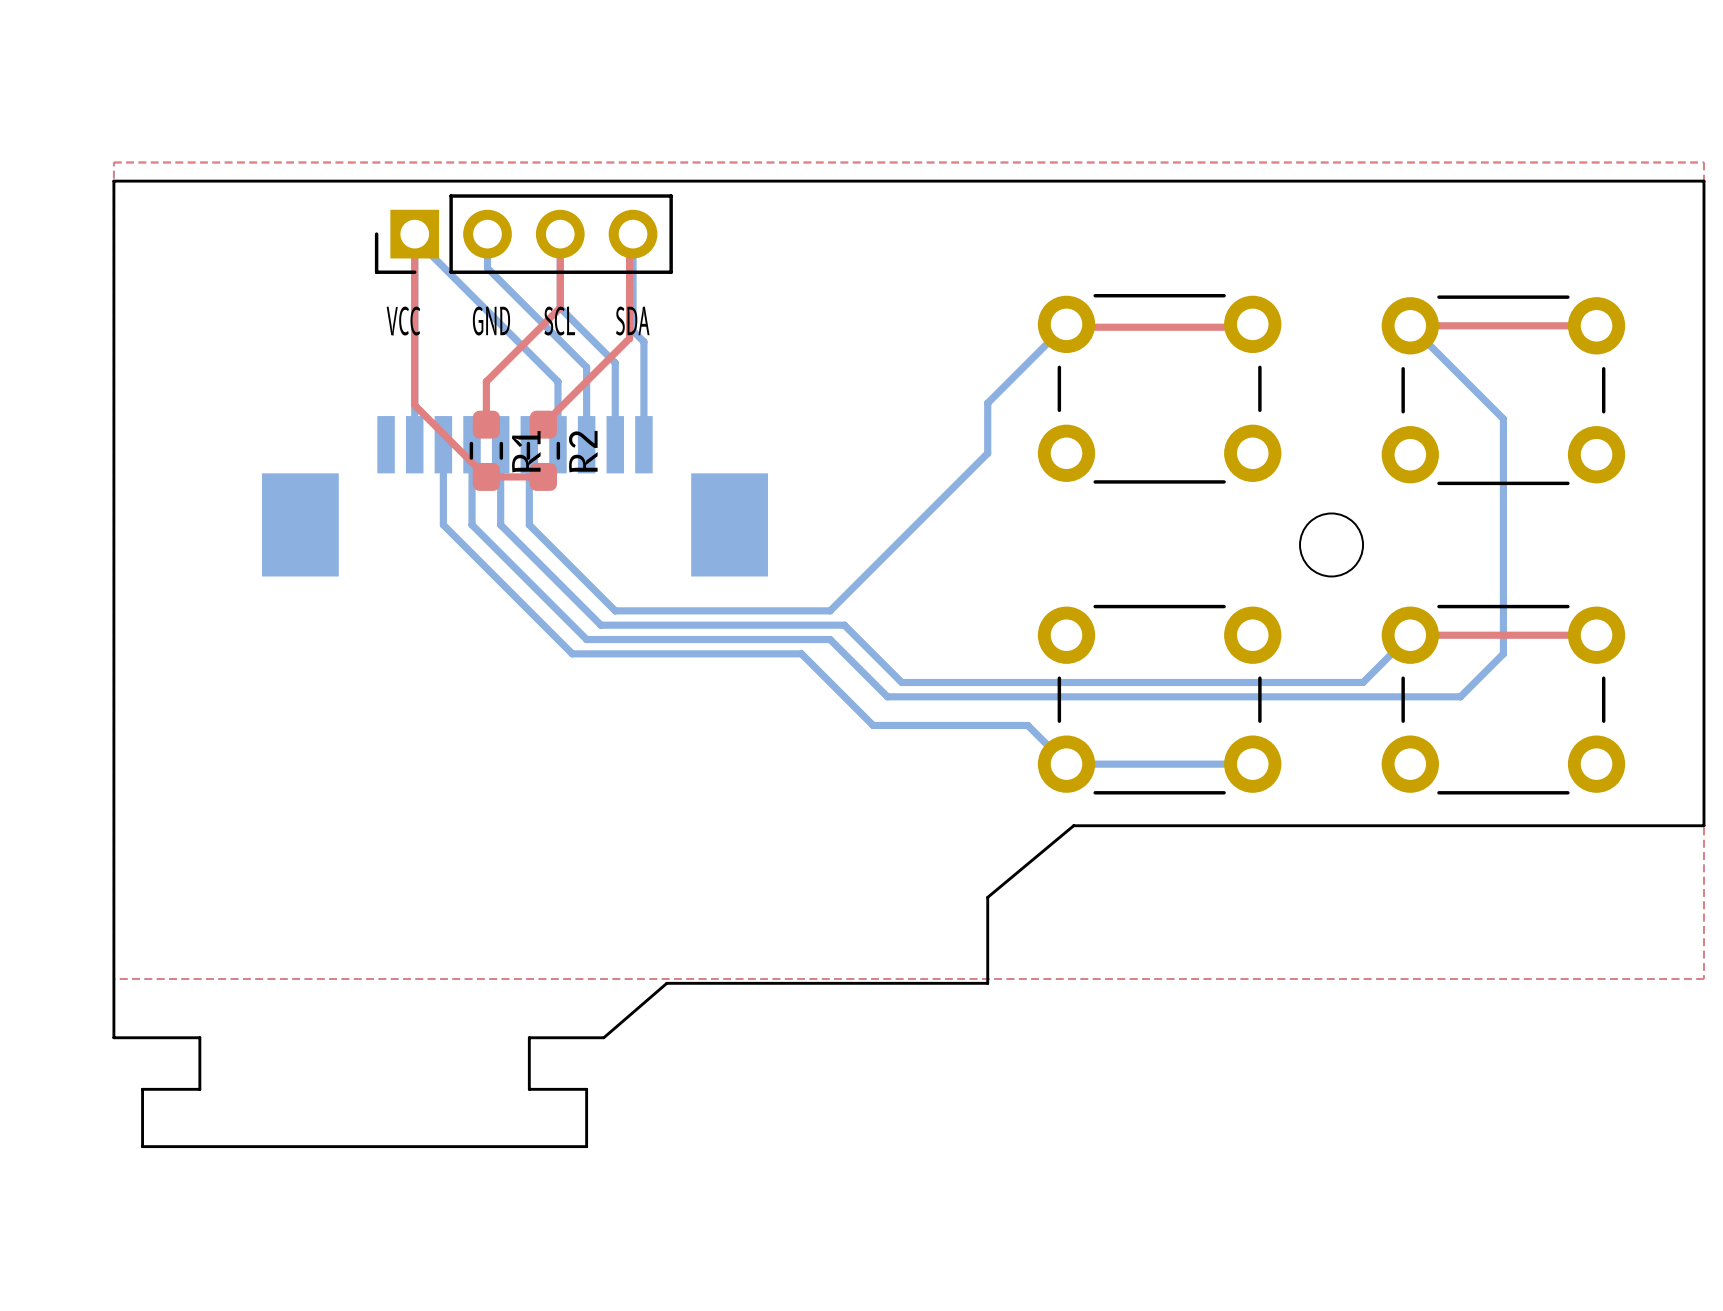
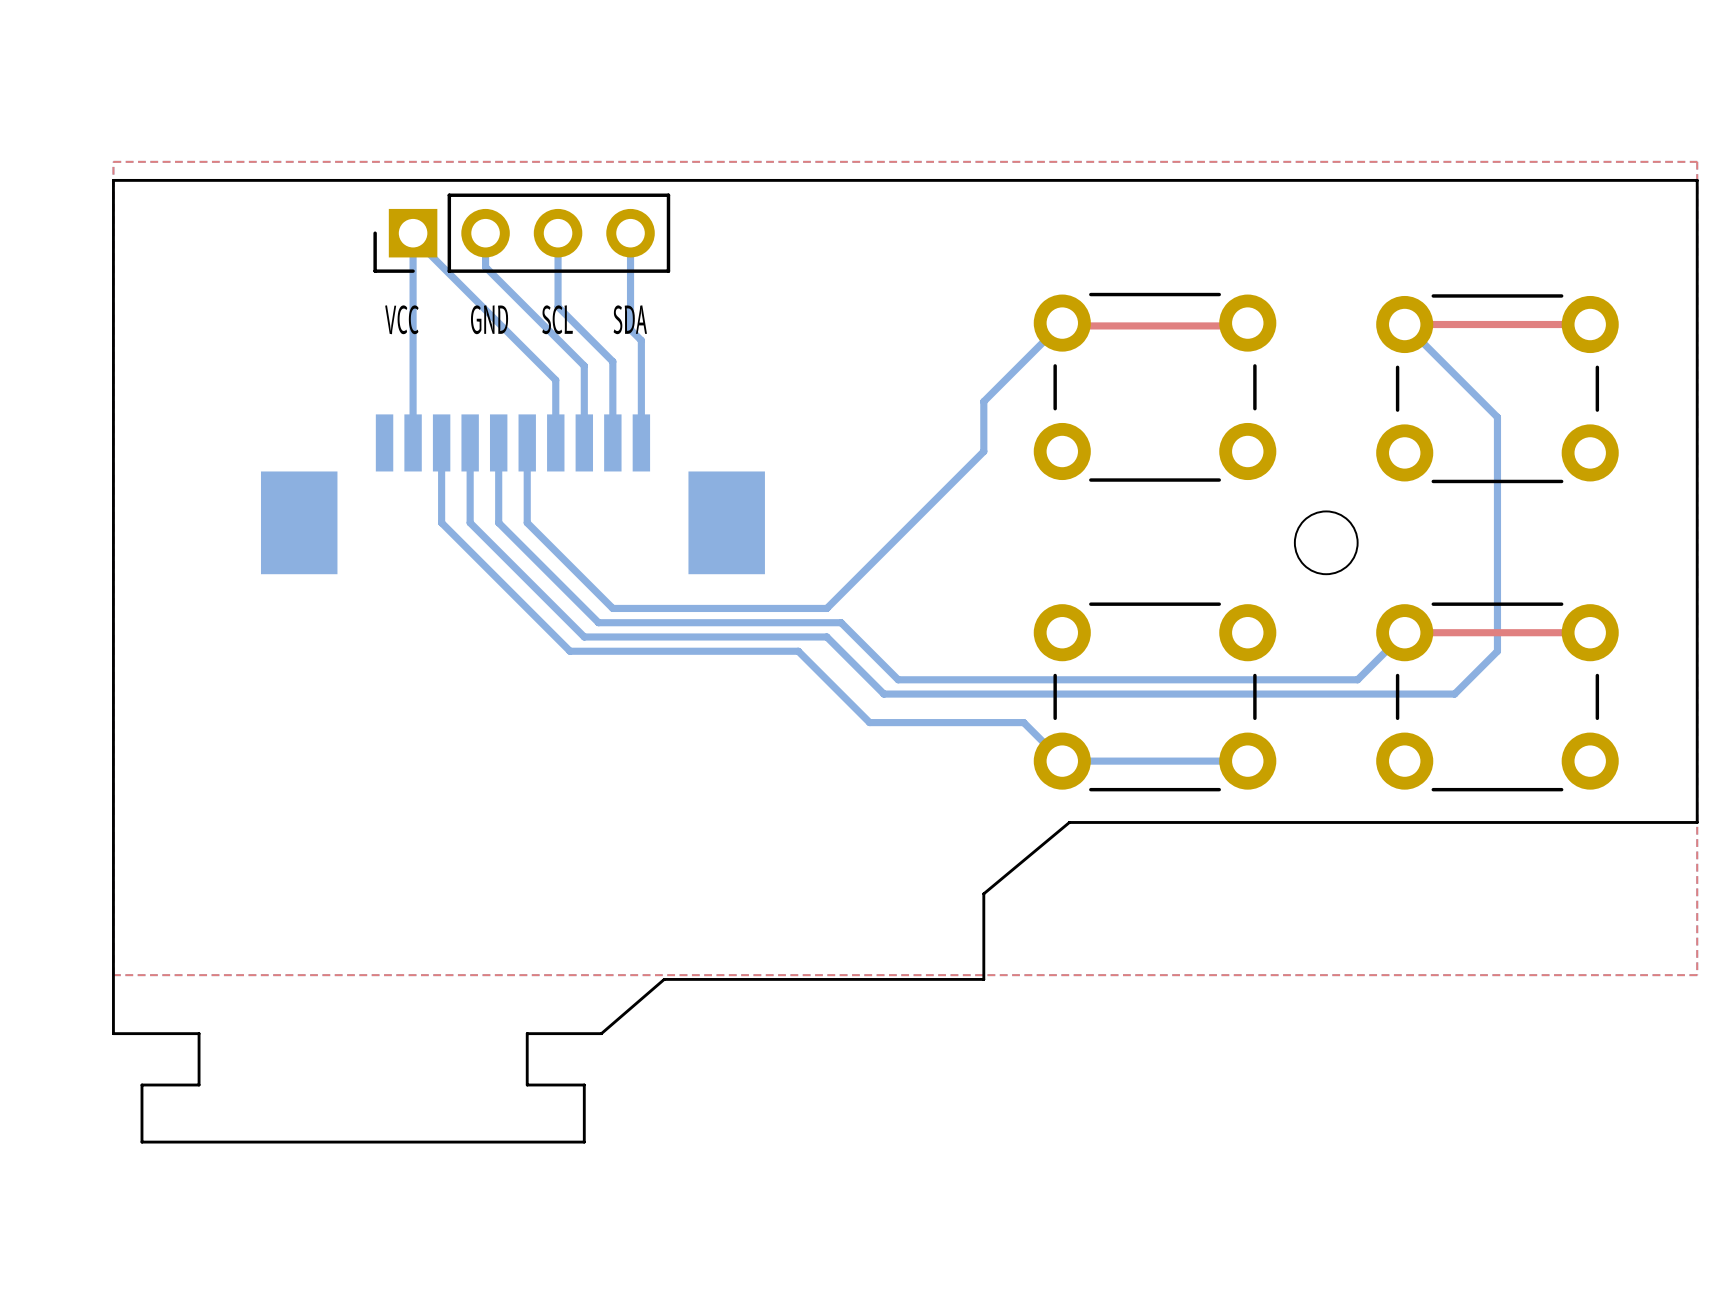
top track: (414, 234) (414, 405) (486, 476) (543, 476) -> none
top track: (560, 234) (560, 307) (486, 381) (486, 424) -> none
top track: (633, 234) (629, 237) (629, 338) (543, 424) -> none
R1: (486, 450) -> none
R2: (543, 450) -> none

